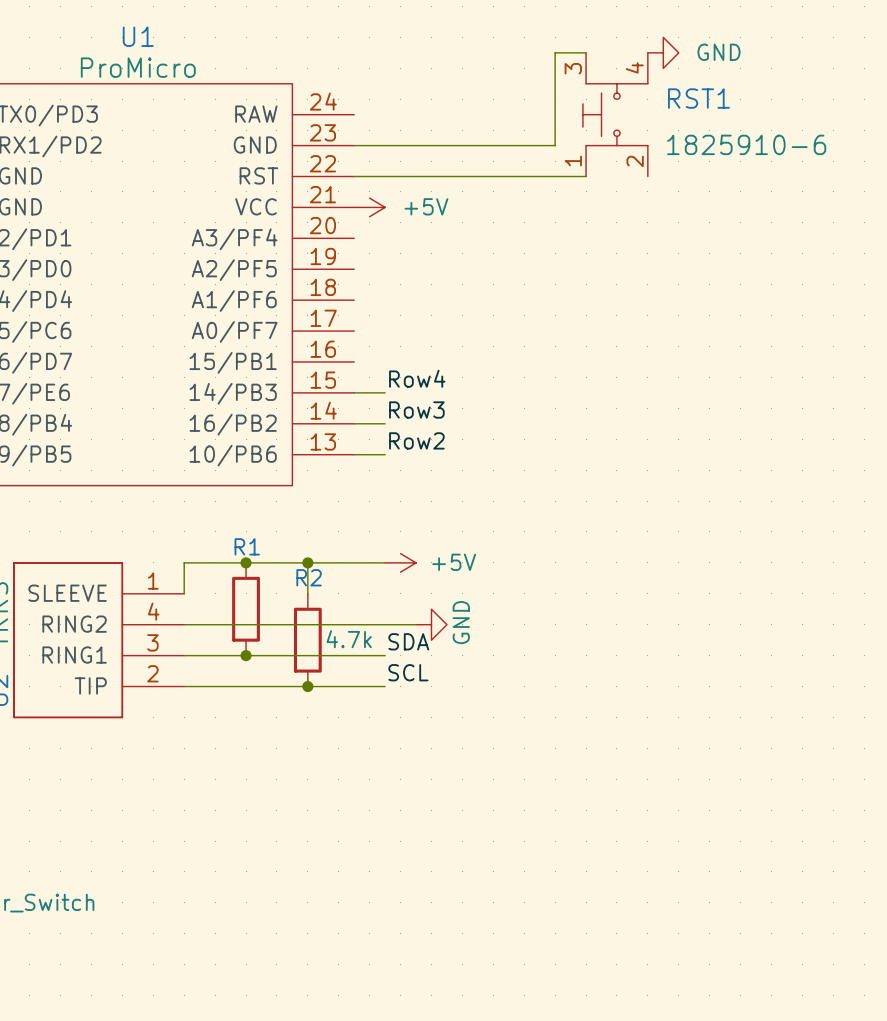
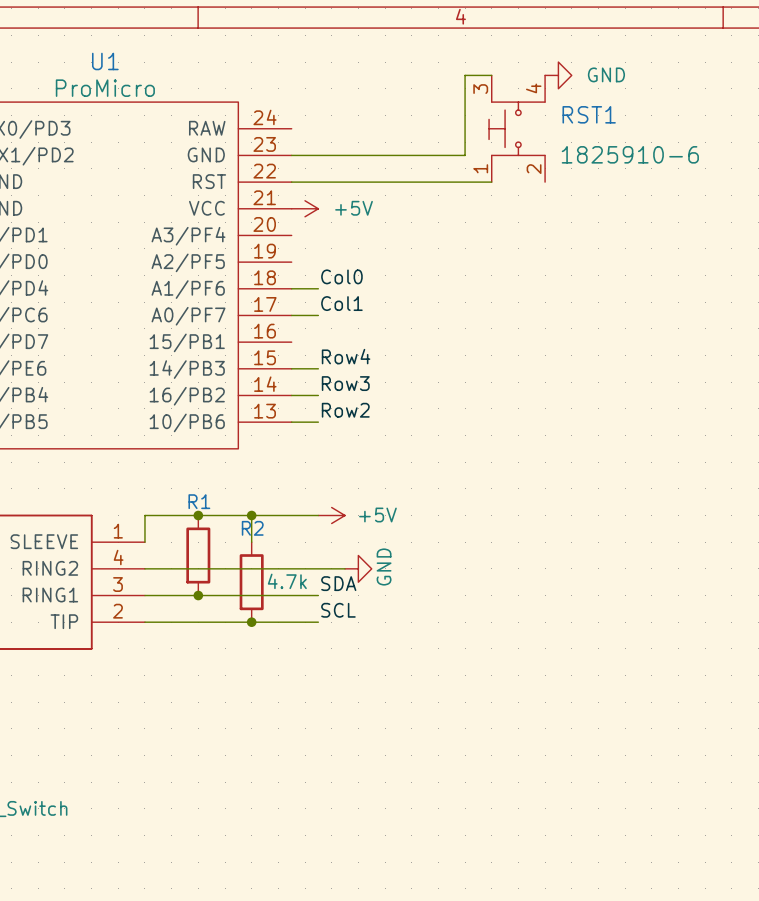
label: none -> Col0 (341, 276)
wire: none -> (291, 288) (318, 288)
label: none -> Col1 (341, 303)
wire: none -> (291, 315) (318, 315)

